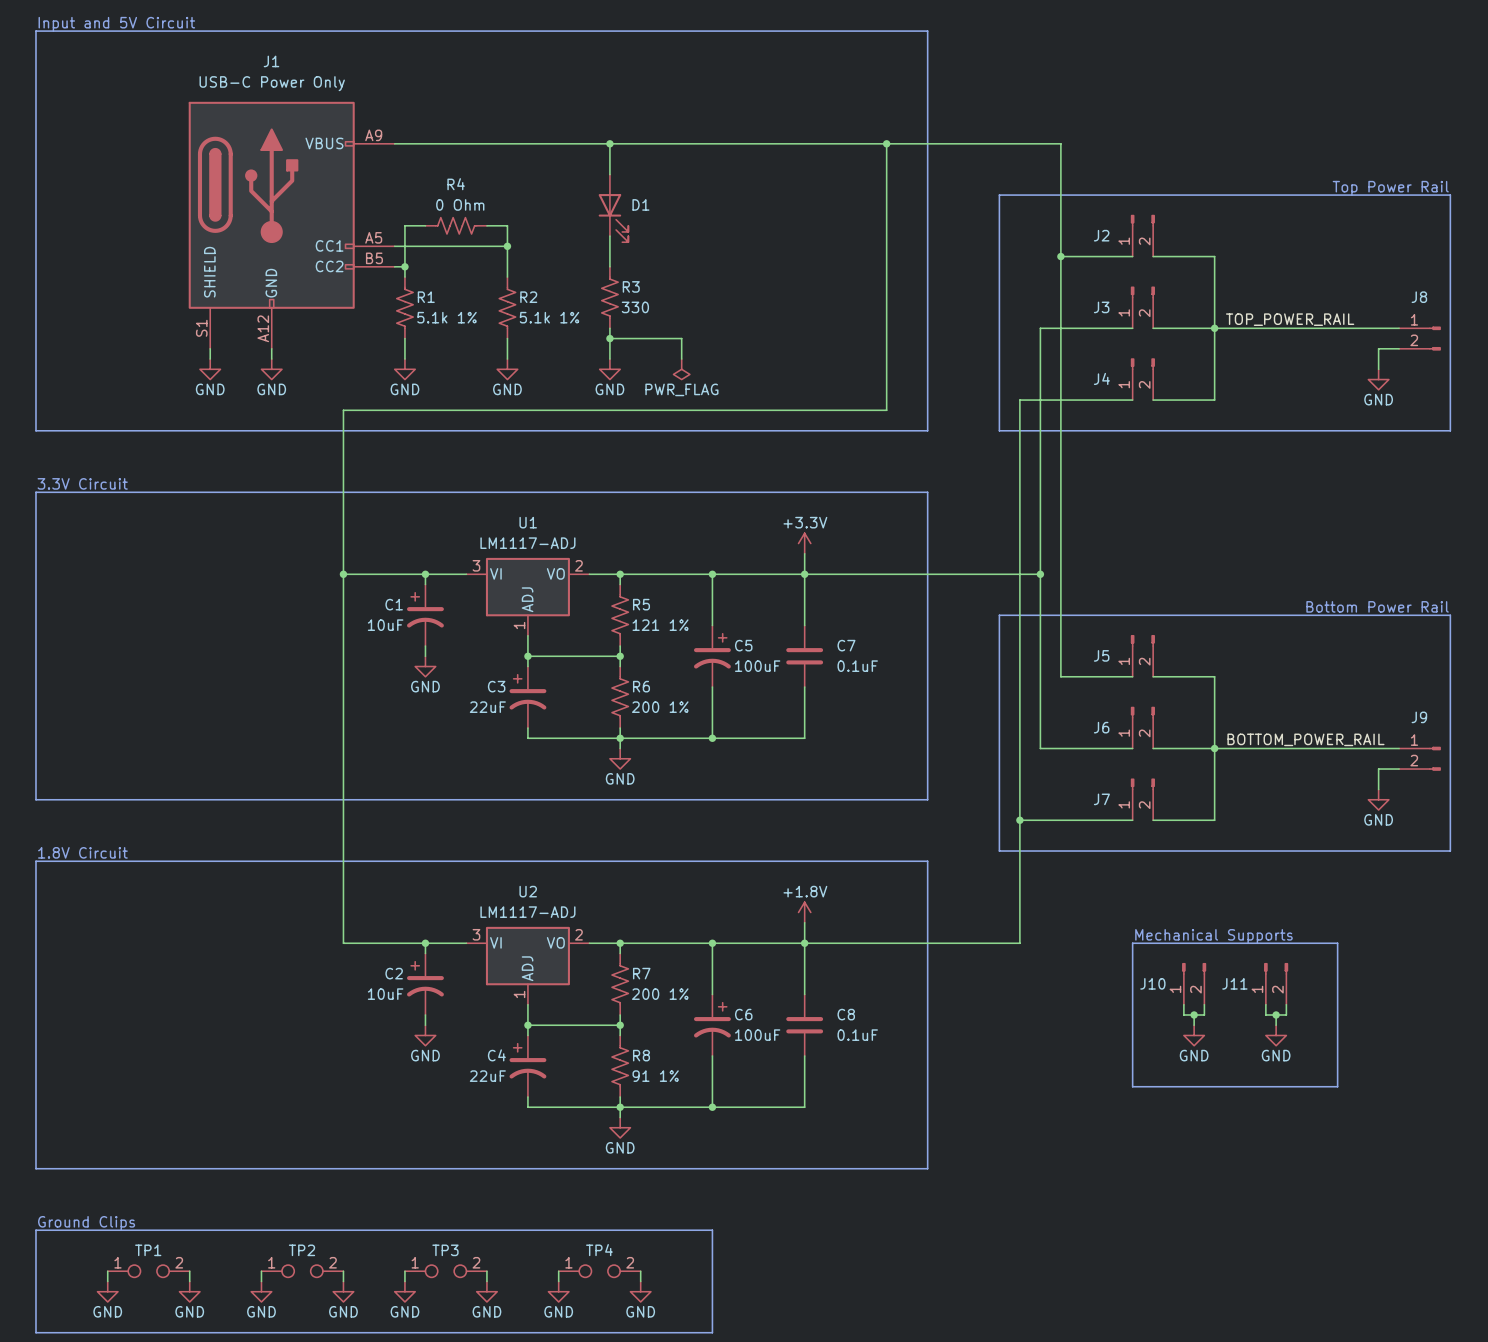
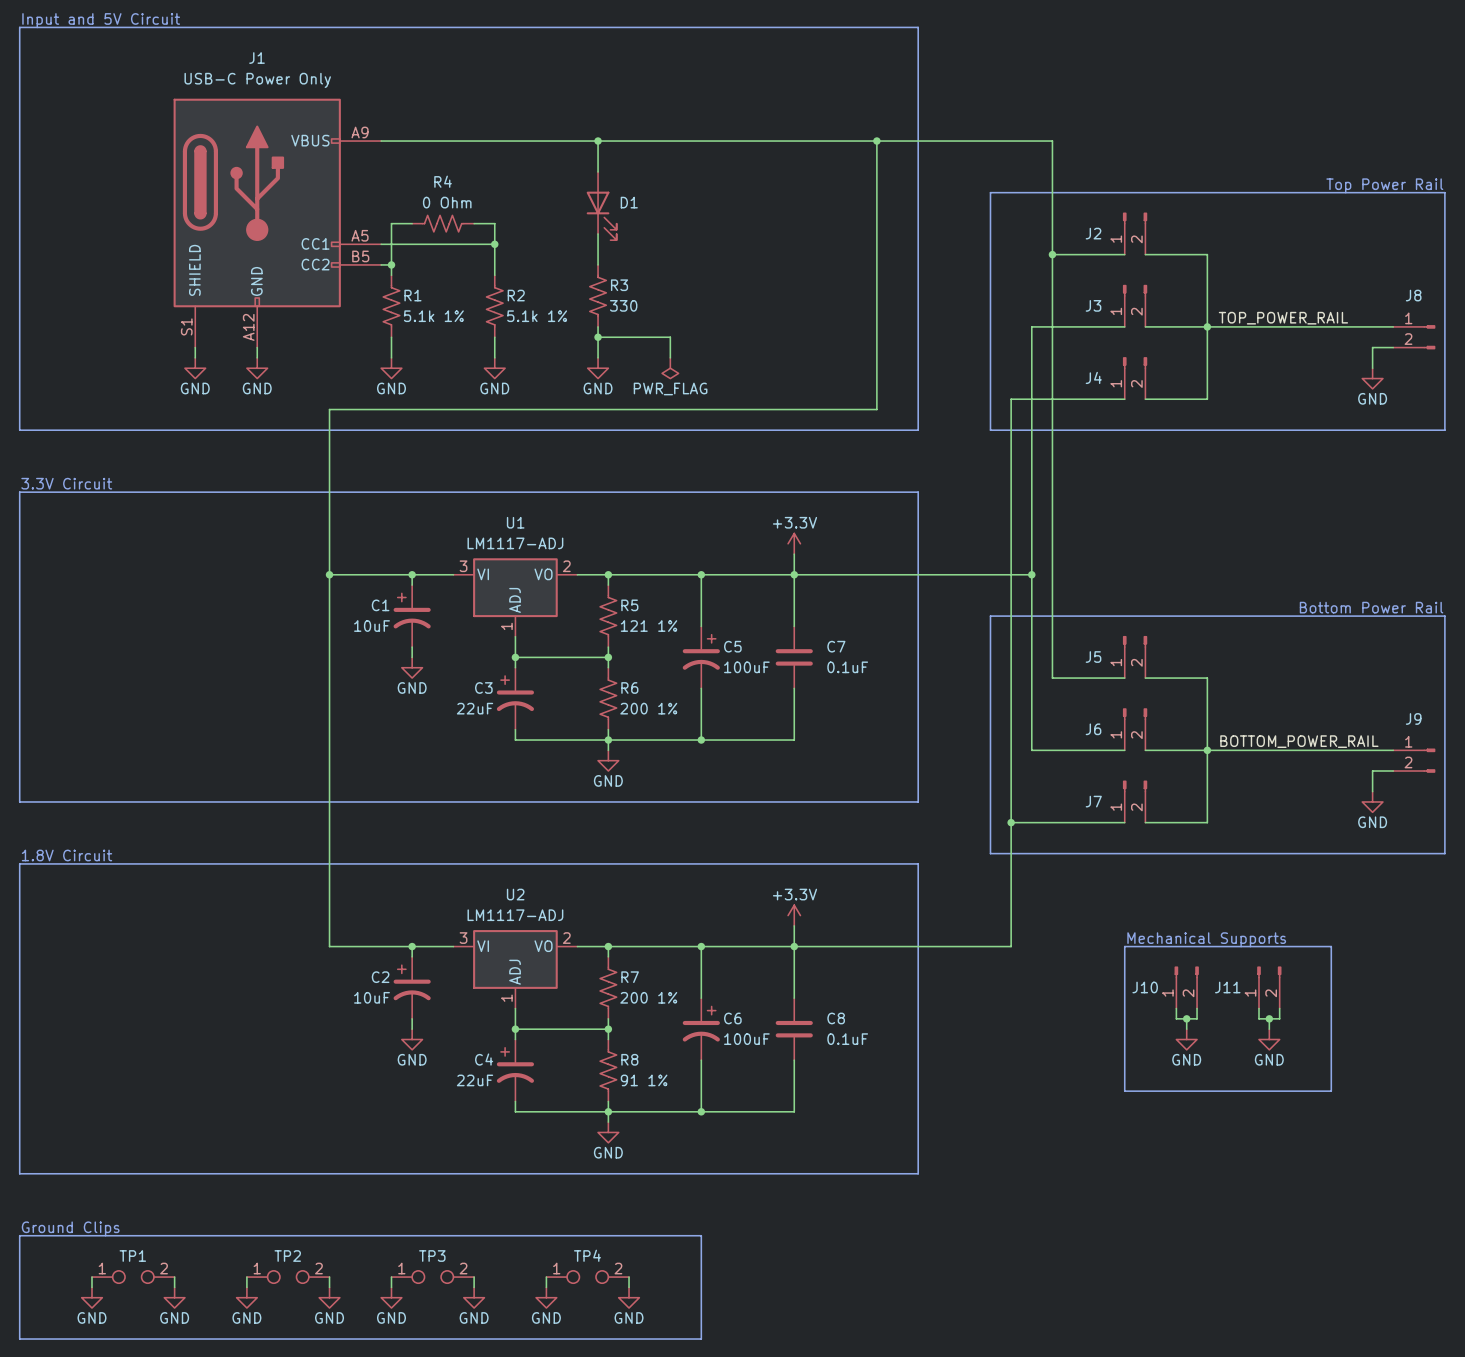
power symbol: +1.8V (804, 912) -> +3.3V (794, 915)

